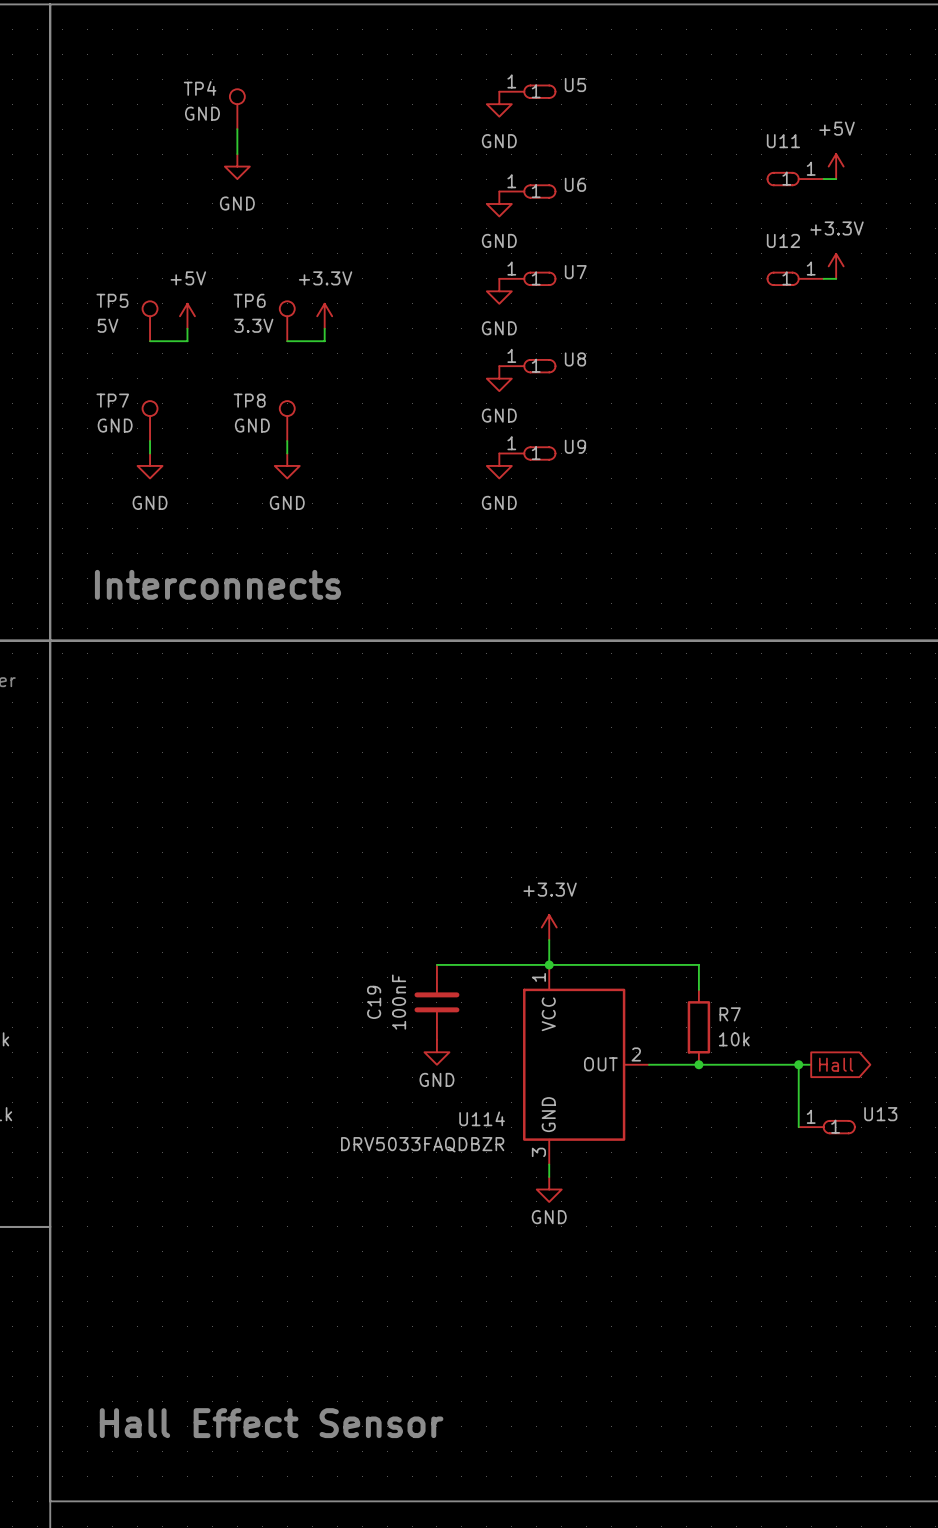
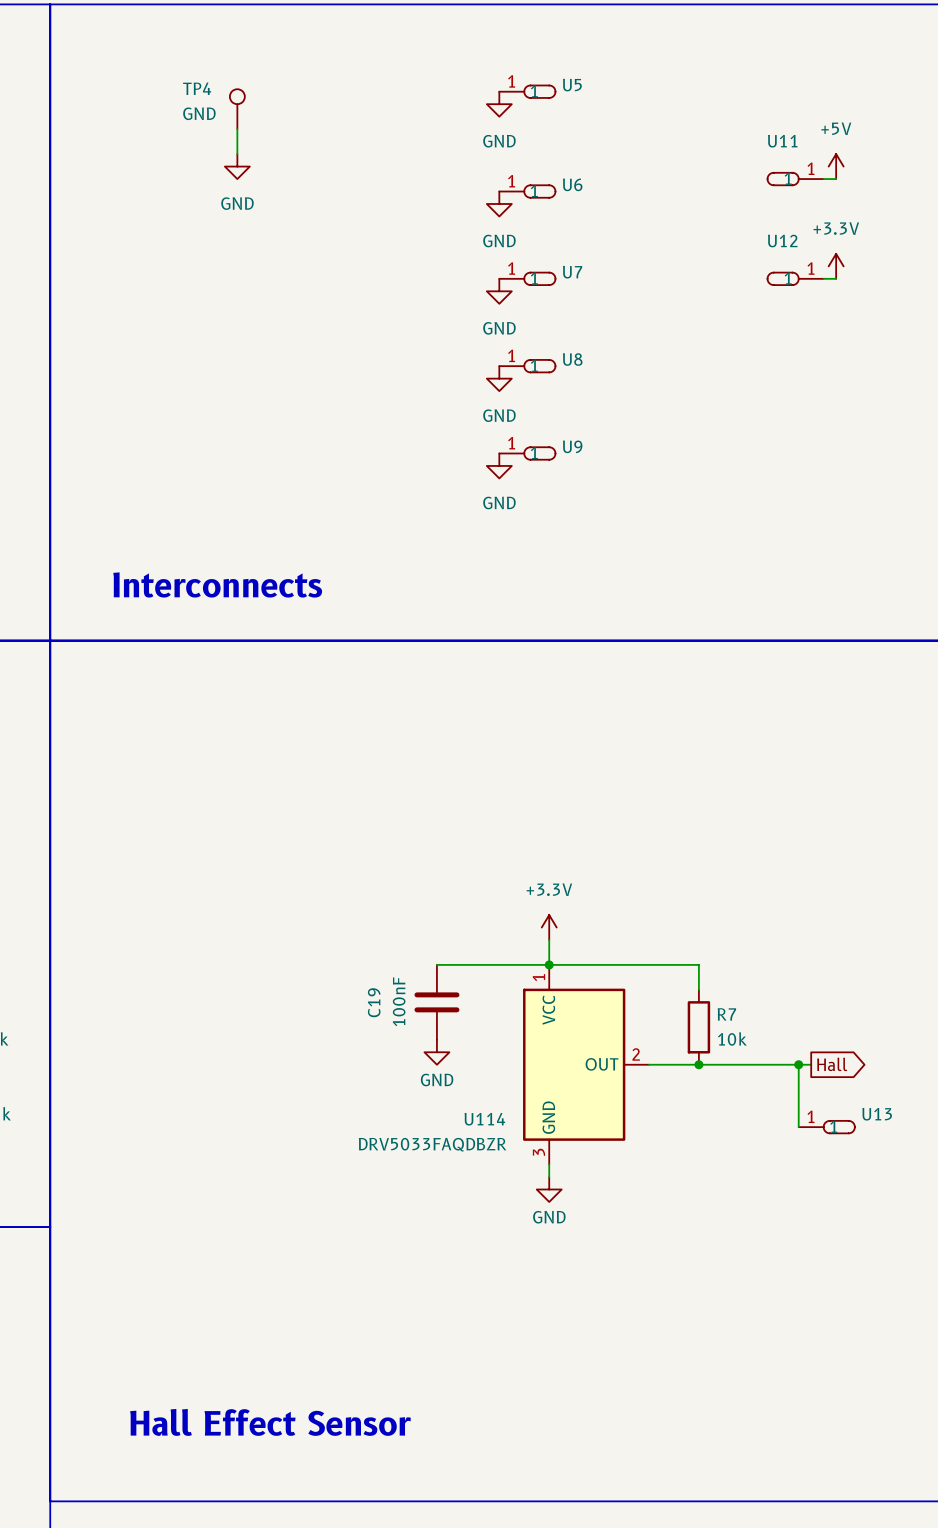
power symbol: +5V (187, 316) -> none
power symbol: +3.3V (324, 316) -> none
TP5: 5V (150, 321) -> none
TP6: 3.3V (287, 321) -> none
wire: (187, 328) (187, 341) (150, 341) -> none
wire: (324, 328) (324, 341) (287, 341) -> none
TP7: GND (150, 421) -> none
TP8: GND (287, 421) -> none
wire: (150, 441) (150, 453) -> none
wire: (287, 441) (287, 453) -> none
power symbol: GND (150, 465) -> none
power symbol: GND (287, 465) -> none

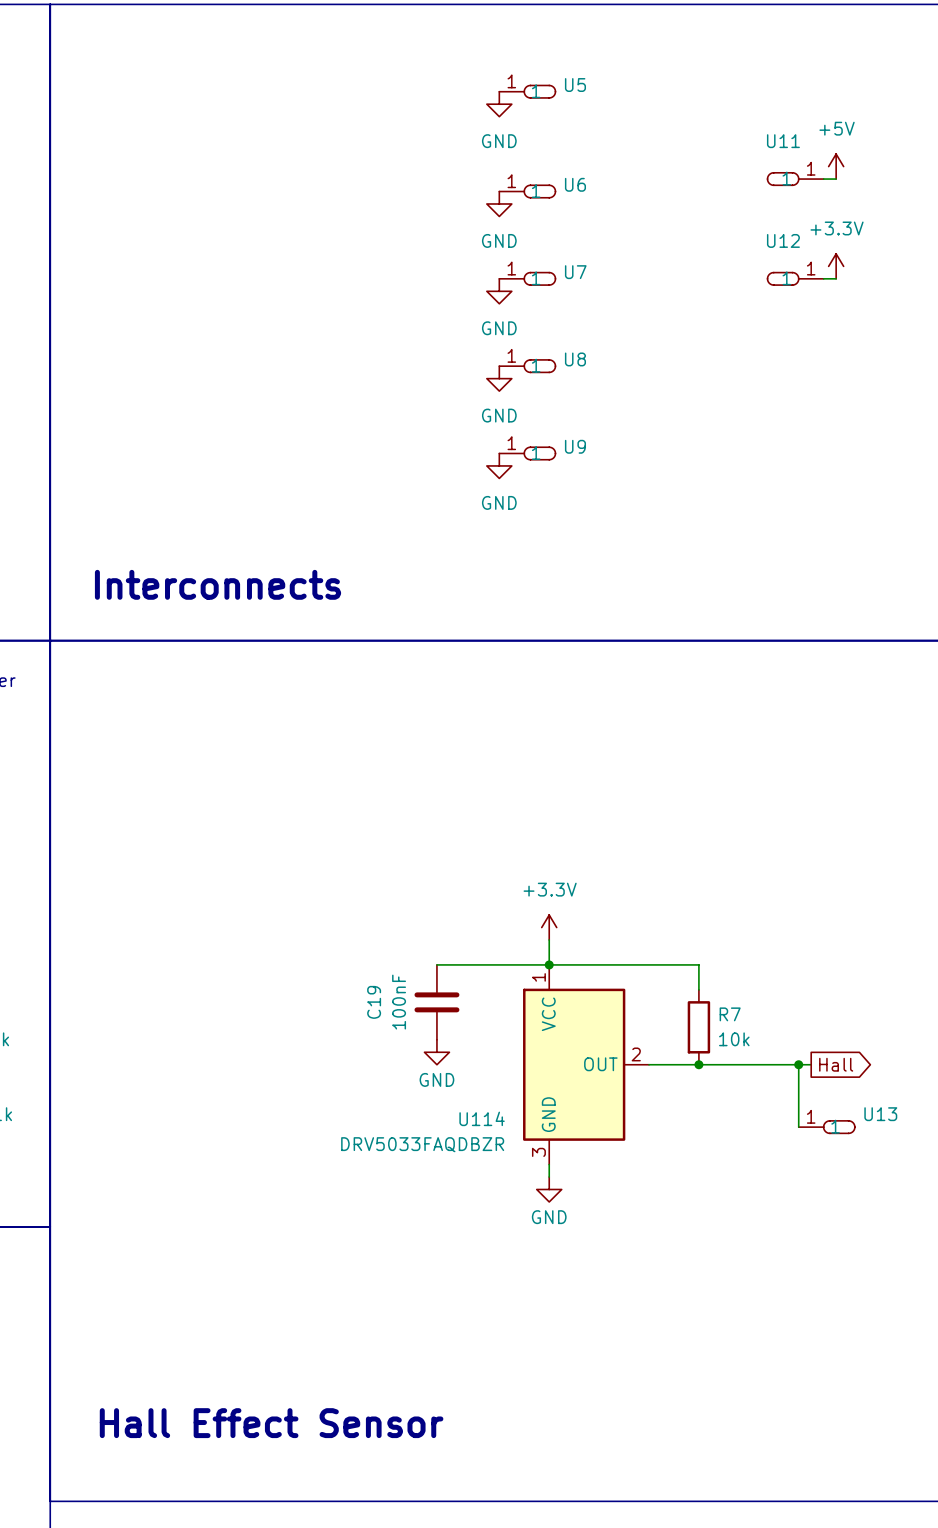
TP4: GND (237, 109) -> none
wire: (237, 129) (237, 154) -> none
power symbol: GND (237, 166) -> none

